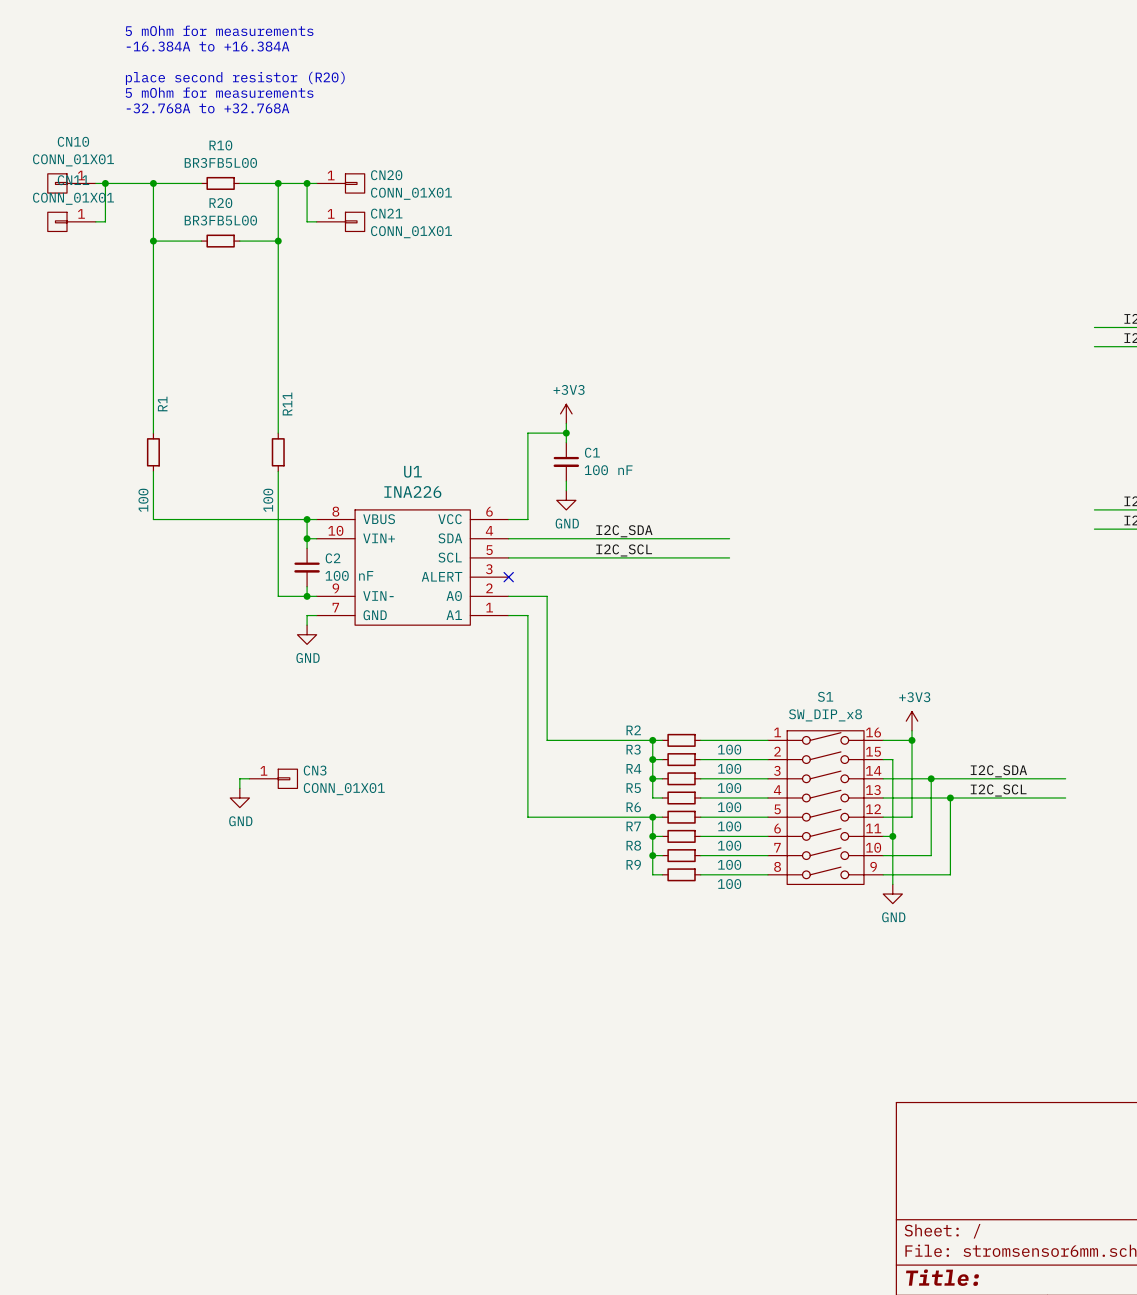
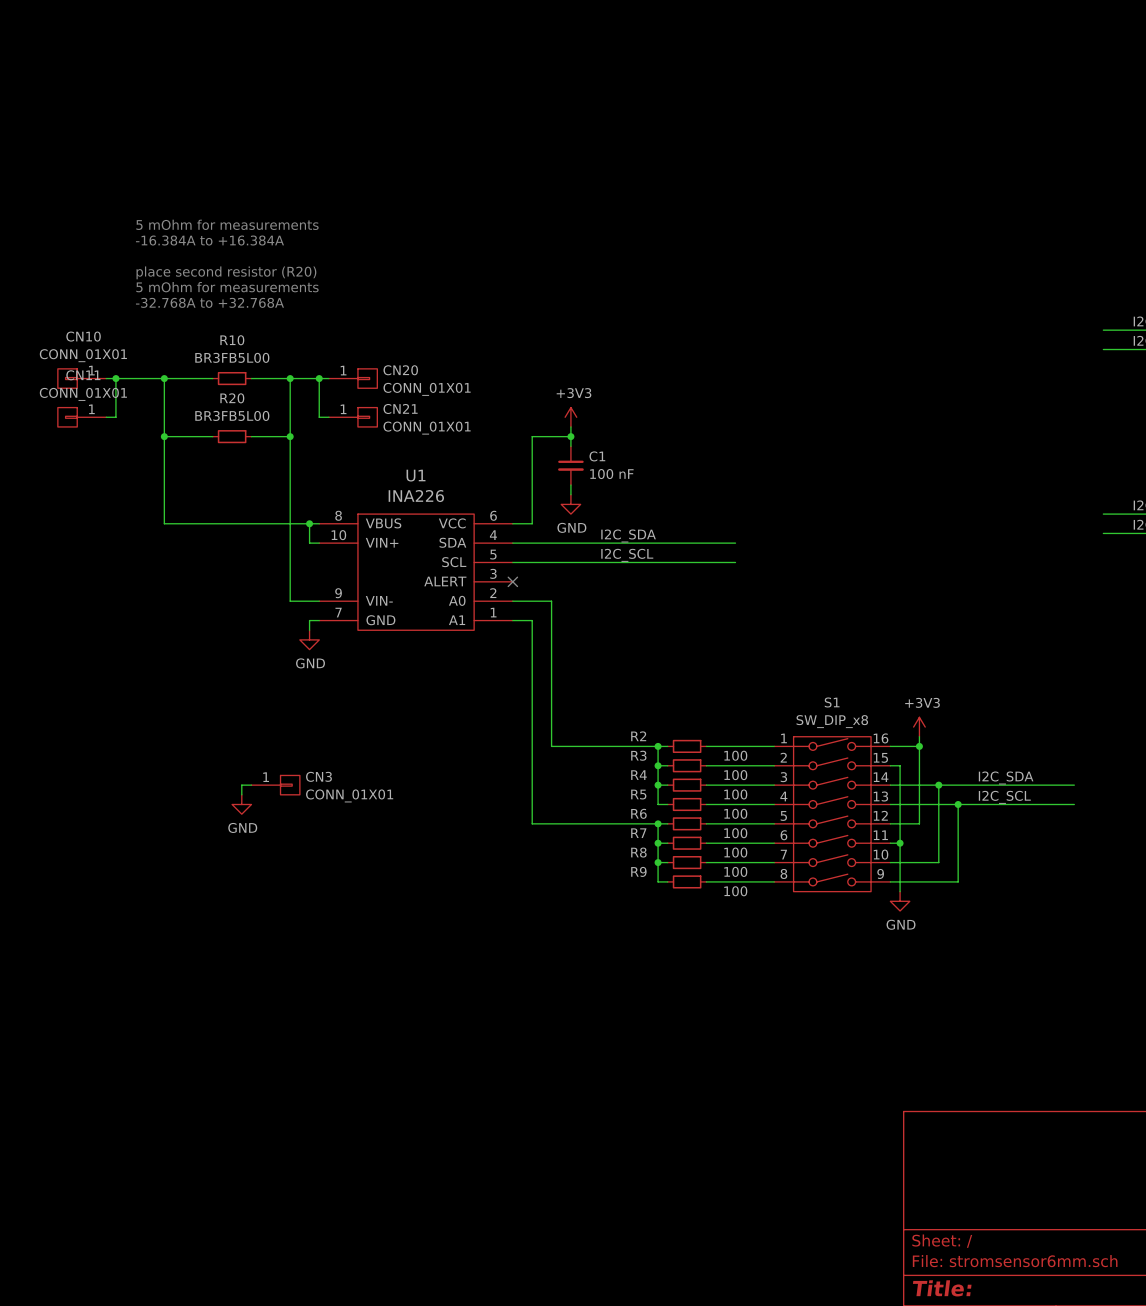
text: 5 mOhm for measurements (219, 30) -> none
text: -16.384A to +16.384A (208, 46) -> none
text: place second resistor (R20) (235, 78) -> none
text: 5 mOhm for measurements (219, 92) -> none
text: -32.768A to +32.768A (208, 108) -> none
CN10 position: (71, 183) -> (82, 378)
wire: (95, 183) (201, 183) -> none
wire: (105, 183) (105, 221) (95, 221) -> none
junction: (105, 183) -> none
wire: (153, 183) (153, 433) -> none
junction: (153, 183) -> none
R10 position: (220, 183) -> (232, 378)
wire: (239, 183) (316, 183) -> none
wire: (278, 183) (278, 433) -> none
junction: (278, 183) -> none
wire: (307, 183) (307, 221) (316, 221) -> none
junction: (307, 183) -> none
CN20 position: (340, 183) -> (353, 378)
CN11 position: (71, 221) -> (82, 417)
CN21 position: (340, 221) -> (353, 417)
text: none -> 5 mOhm for measurements (227, 224)
text: none -> -16.384A to +16.384A (209, 240)
wire: (153, 241) (201, 241) -> none
junction: (153, 241) -> none
R20 position: (220, 241) -> (232, 436)
wire: (239, 241) (278, 241) -> none
junction: (278, 241) -> none
text: none -> place second resistor (R20) (226, 272)
text: none -> 5 mOhm for measurements (227, 287)
text: none -> -32.768A to +32.768A (209, 302)
wire: none -> (106, 378) (212, 378)
wire: none -> (115, 378) (115, 417) (106, 417)
junction: none -> (115, 378)
junction: none -> (164, 378)
wire: none -> (251, 378) (328, 378)
junction: none -> (290, 378)
wire: none -> (319, 378) (319, 417) (328, 417)
junction: none -> (319, 378)
wire: none -> (164, 436) (212, 436)
junction: none -> (164, 436)
wire: none -> (251, 436) (290, 436)
junction: none -> (290, 436)
R1: 100 (153, 452) -> none
R11: 100 (278, 452) -> none
wire: (153, 471) (153, 519) (163, 519) -> (164, 378) (164, 523)
wire: (278, 471) (278, 596) (287, 596) -> (290, 378) (290, 601)
wire: (307, 538) (307, 548) -> none
junction: (307, 538) -> none
C2: 100 nF (307, 567) -> none
wire: (307, 586) (307, 596) -> none
junction: (307, 596) -> none

